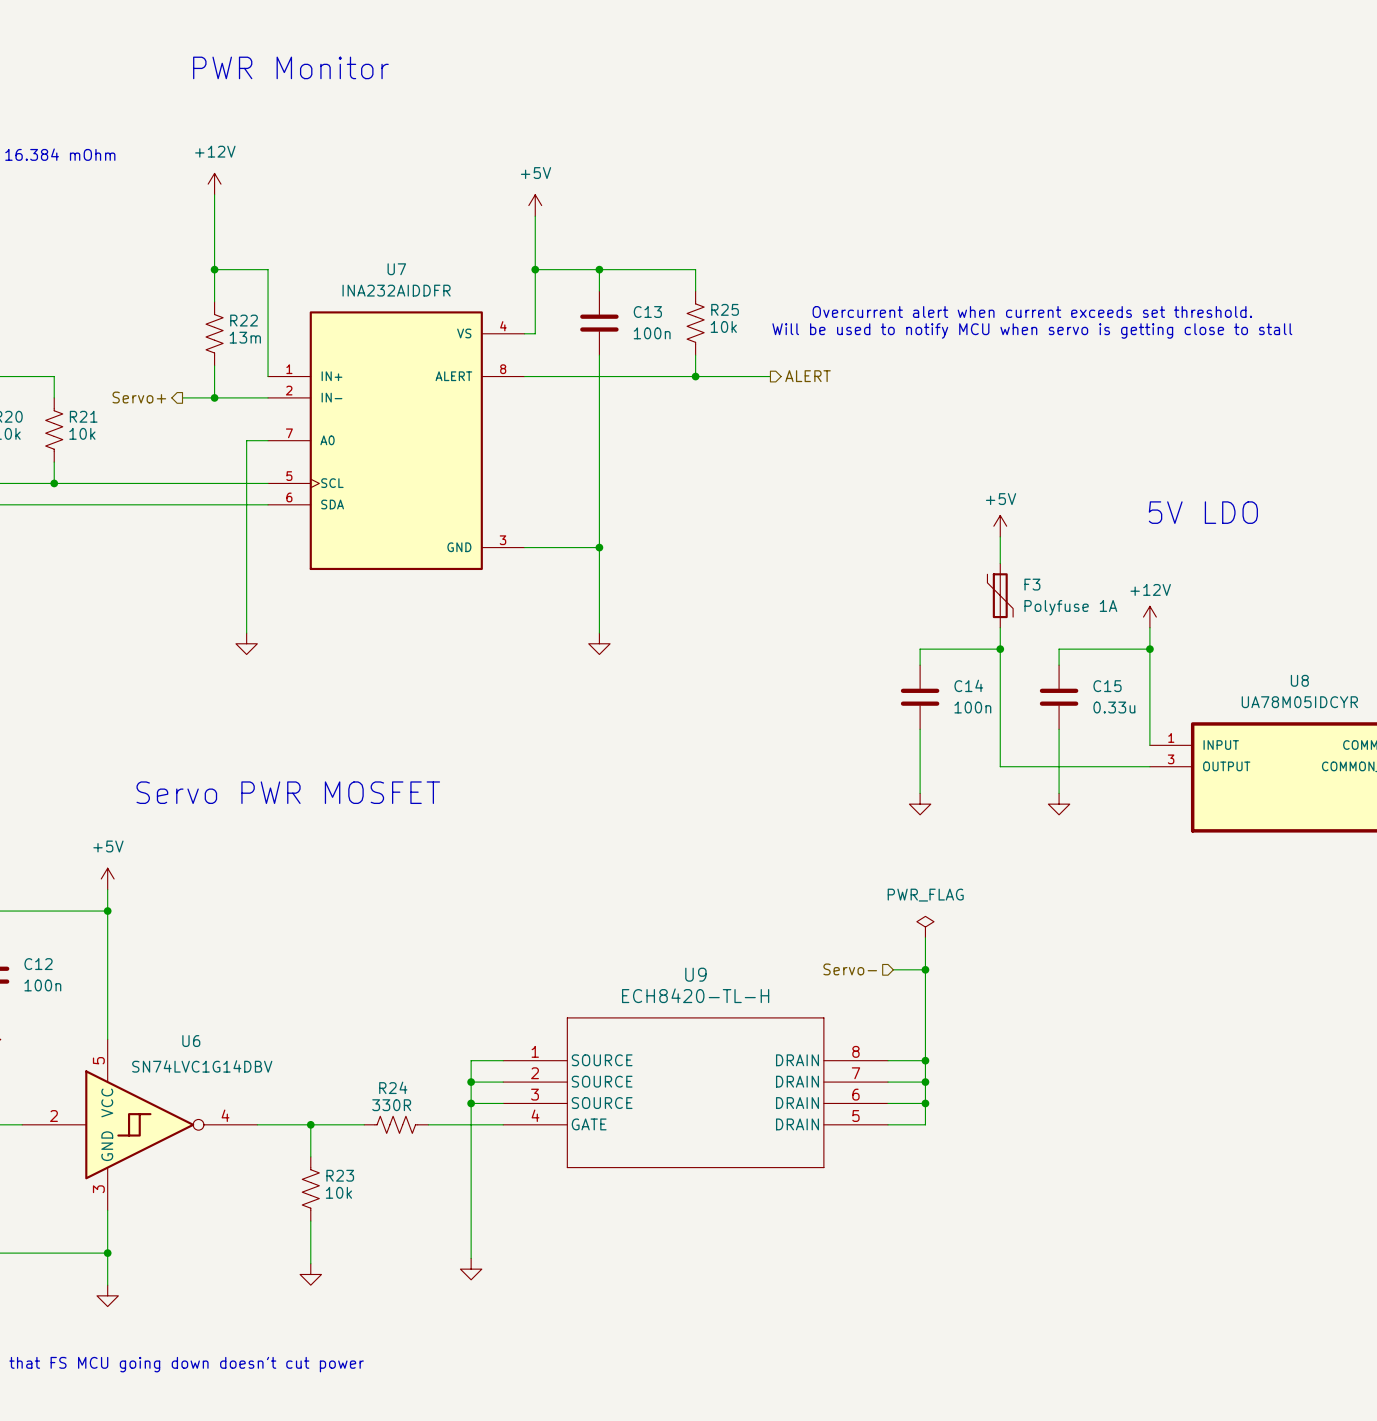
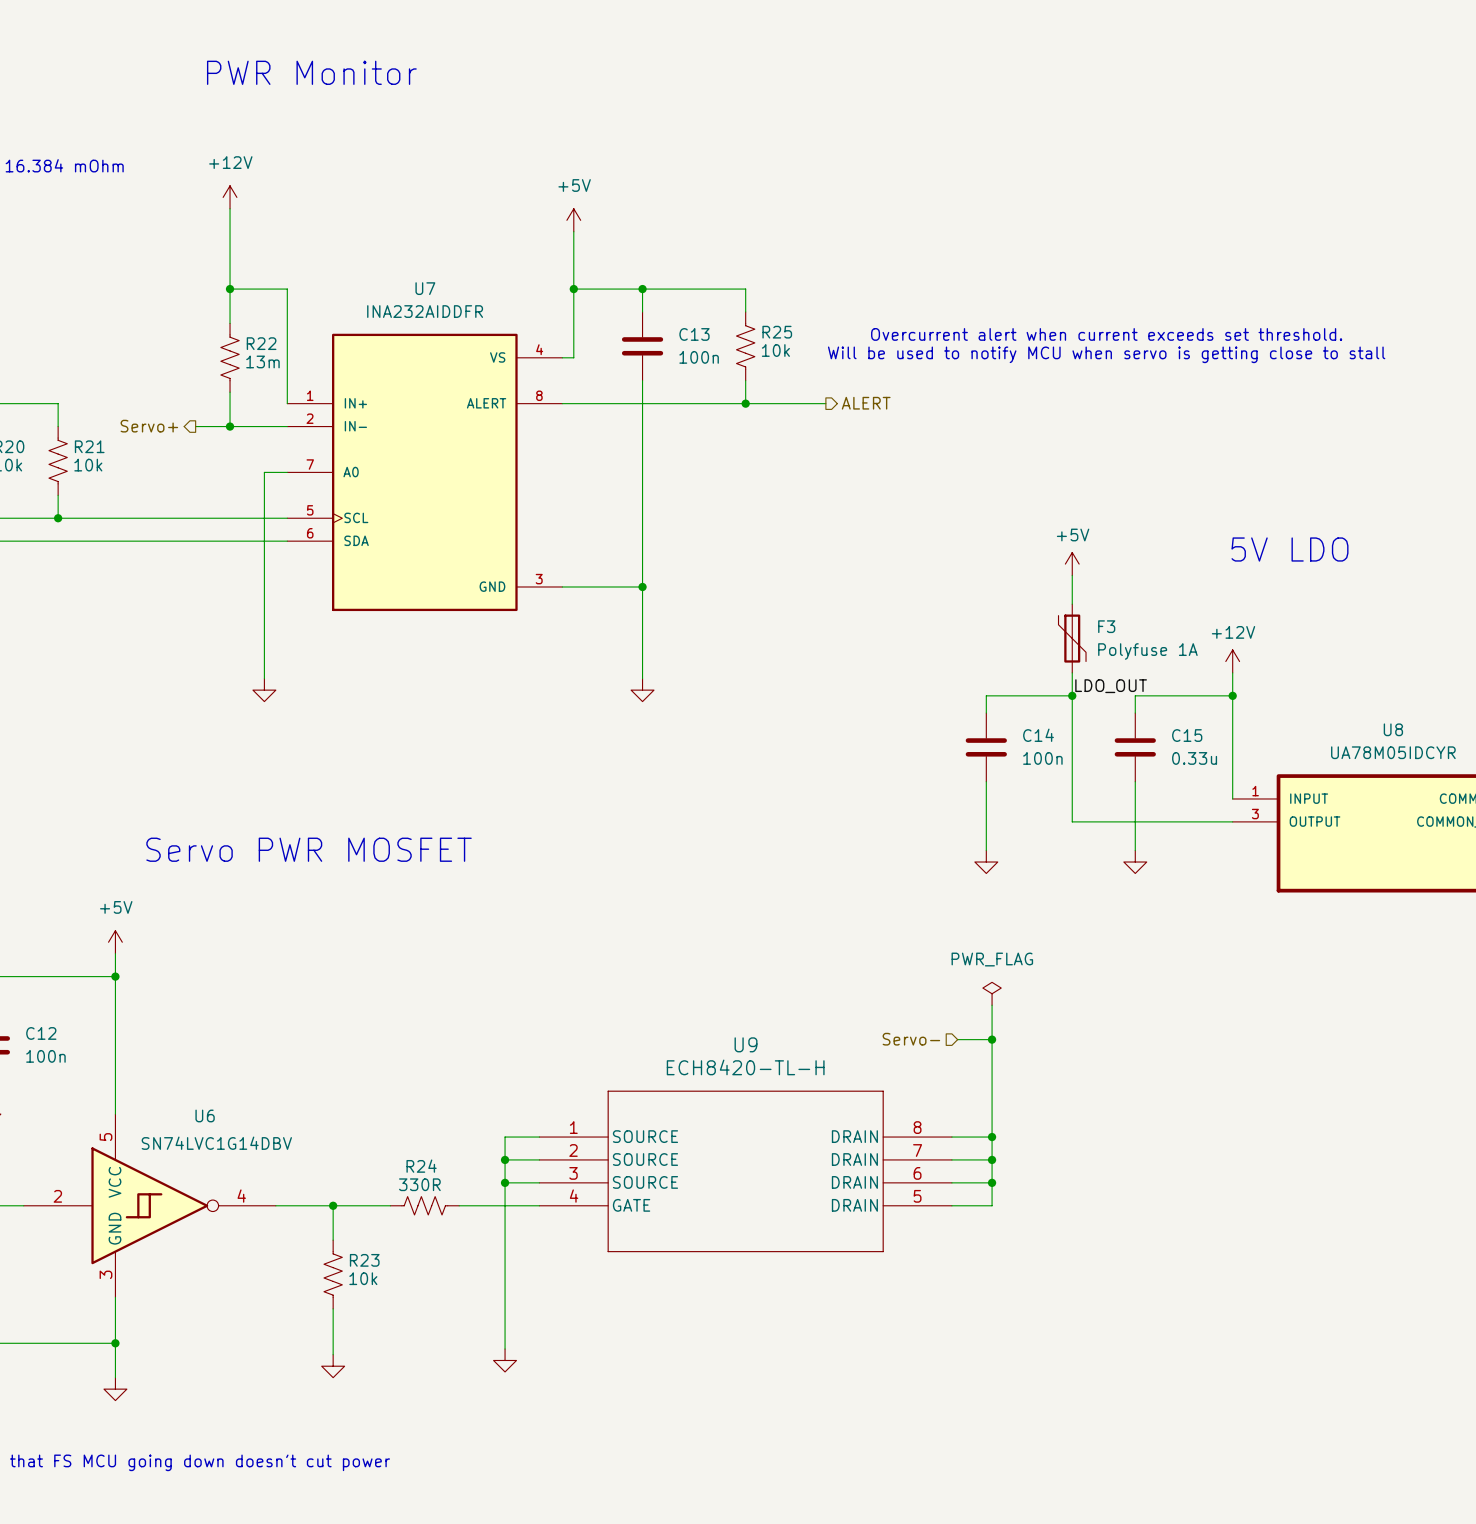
label: none -> LDO_OUT (1111, 686)

